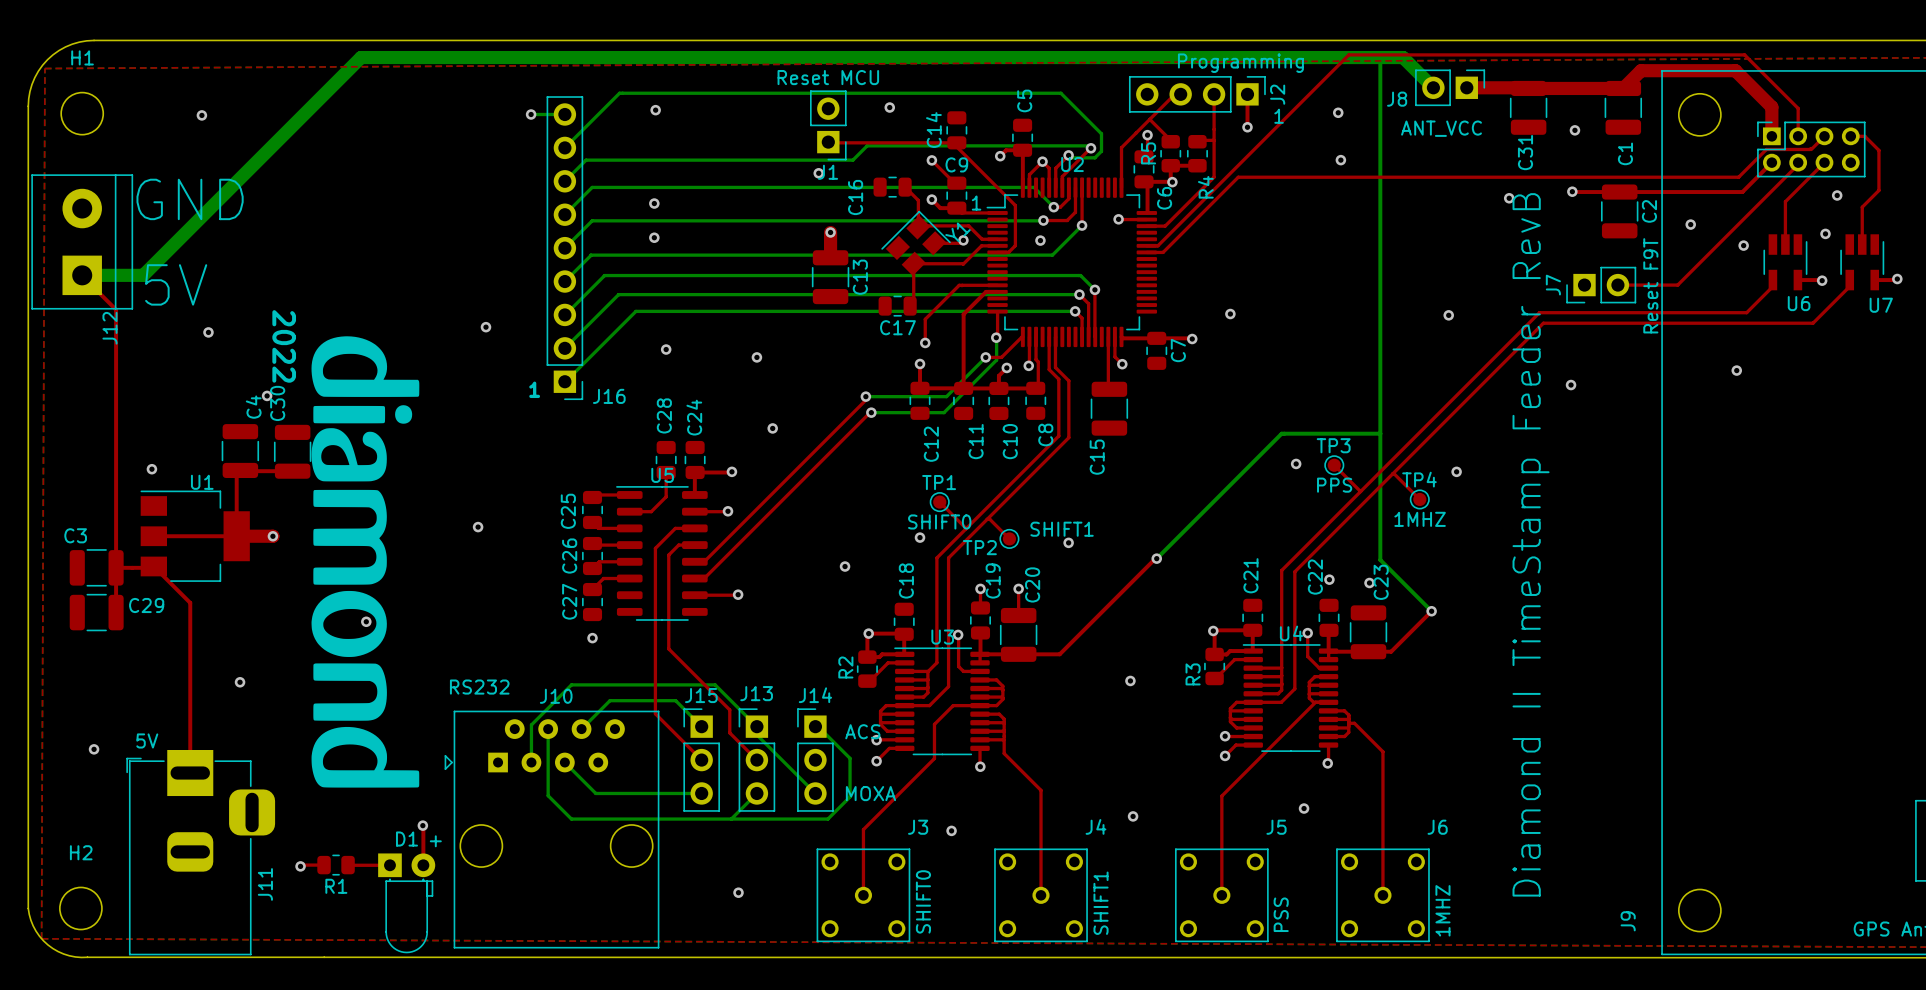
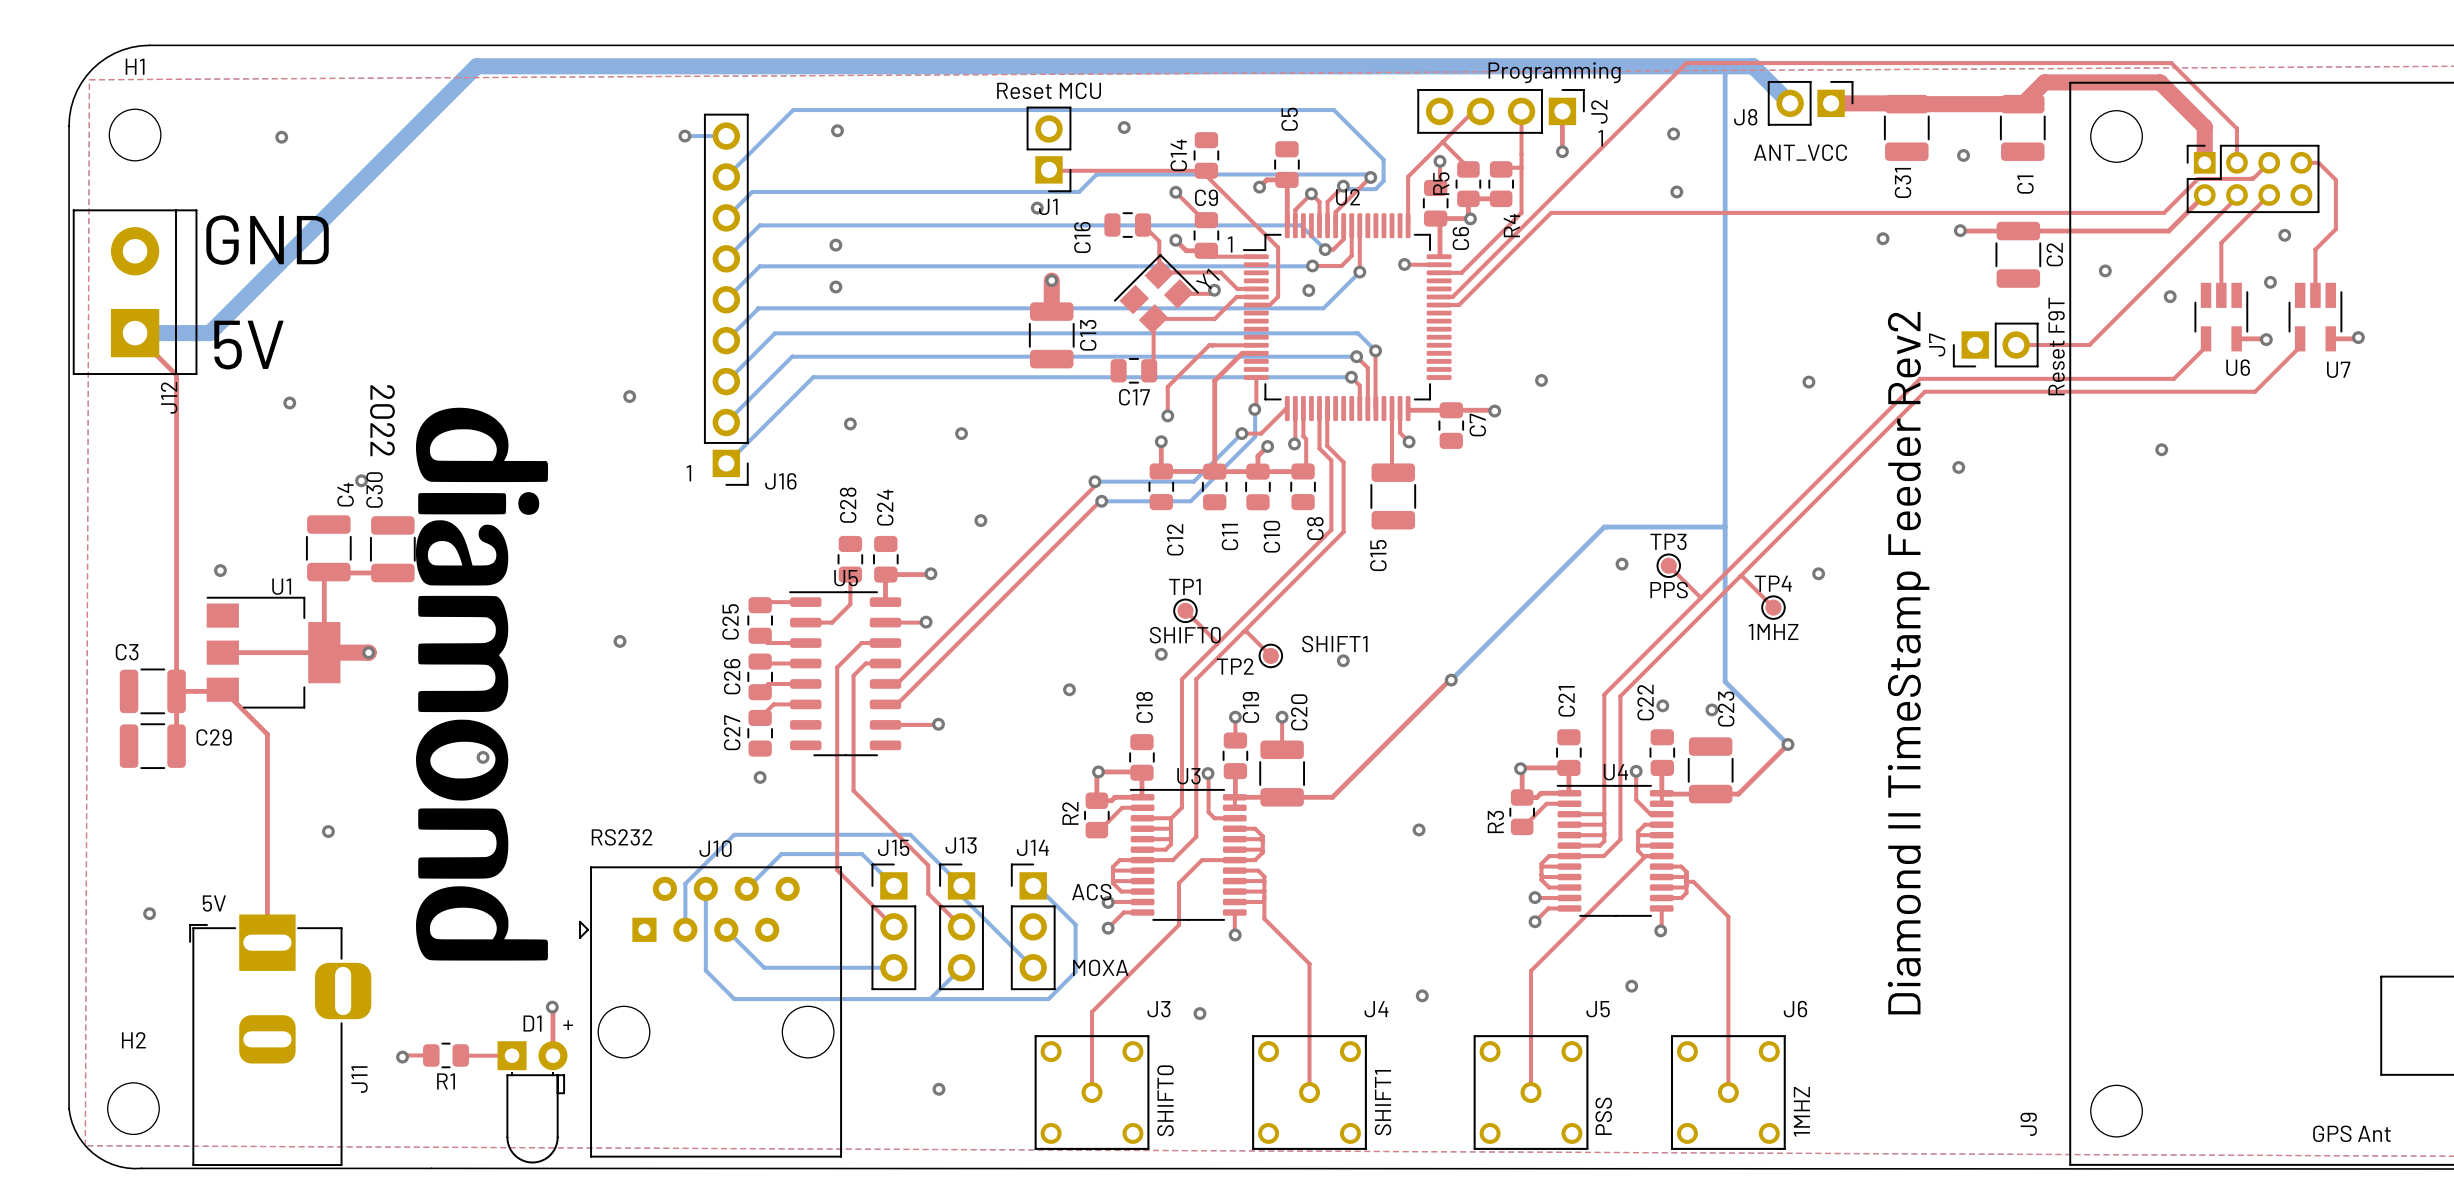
text: Diamond II TimeStamp Feeder RevB (1531, 544) -> Diamond II TimeStamp Feeder Rev2 (1908, 663)

